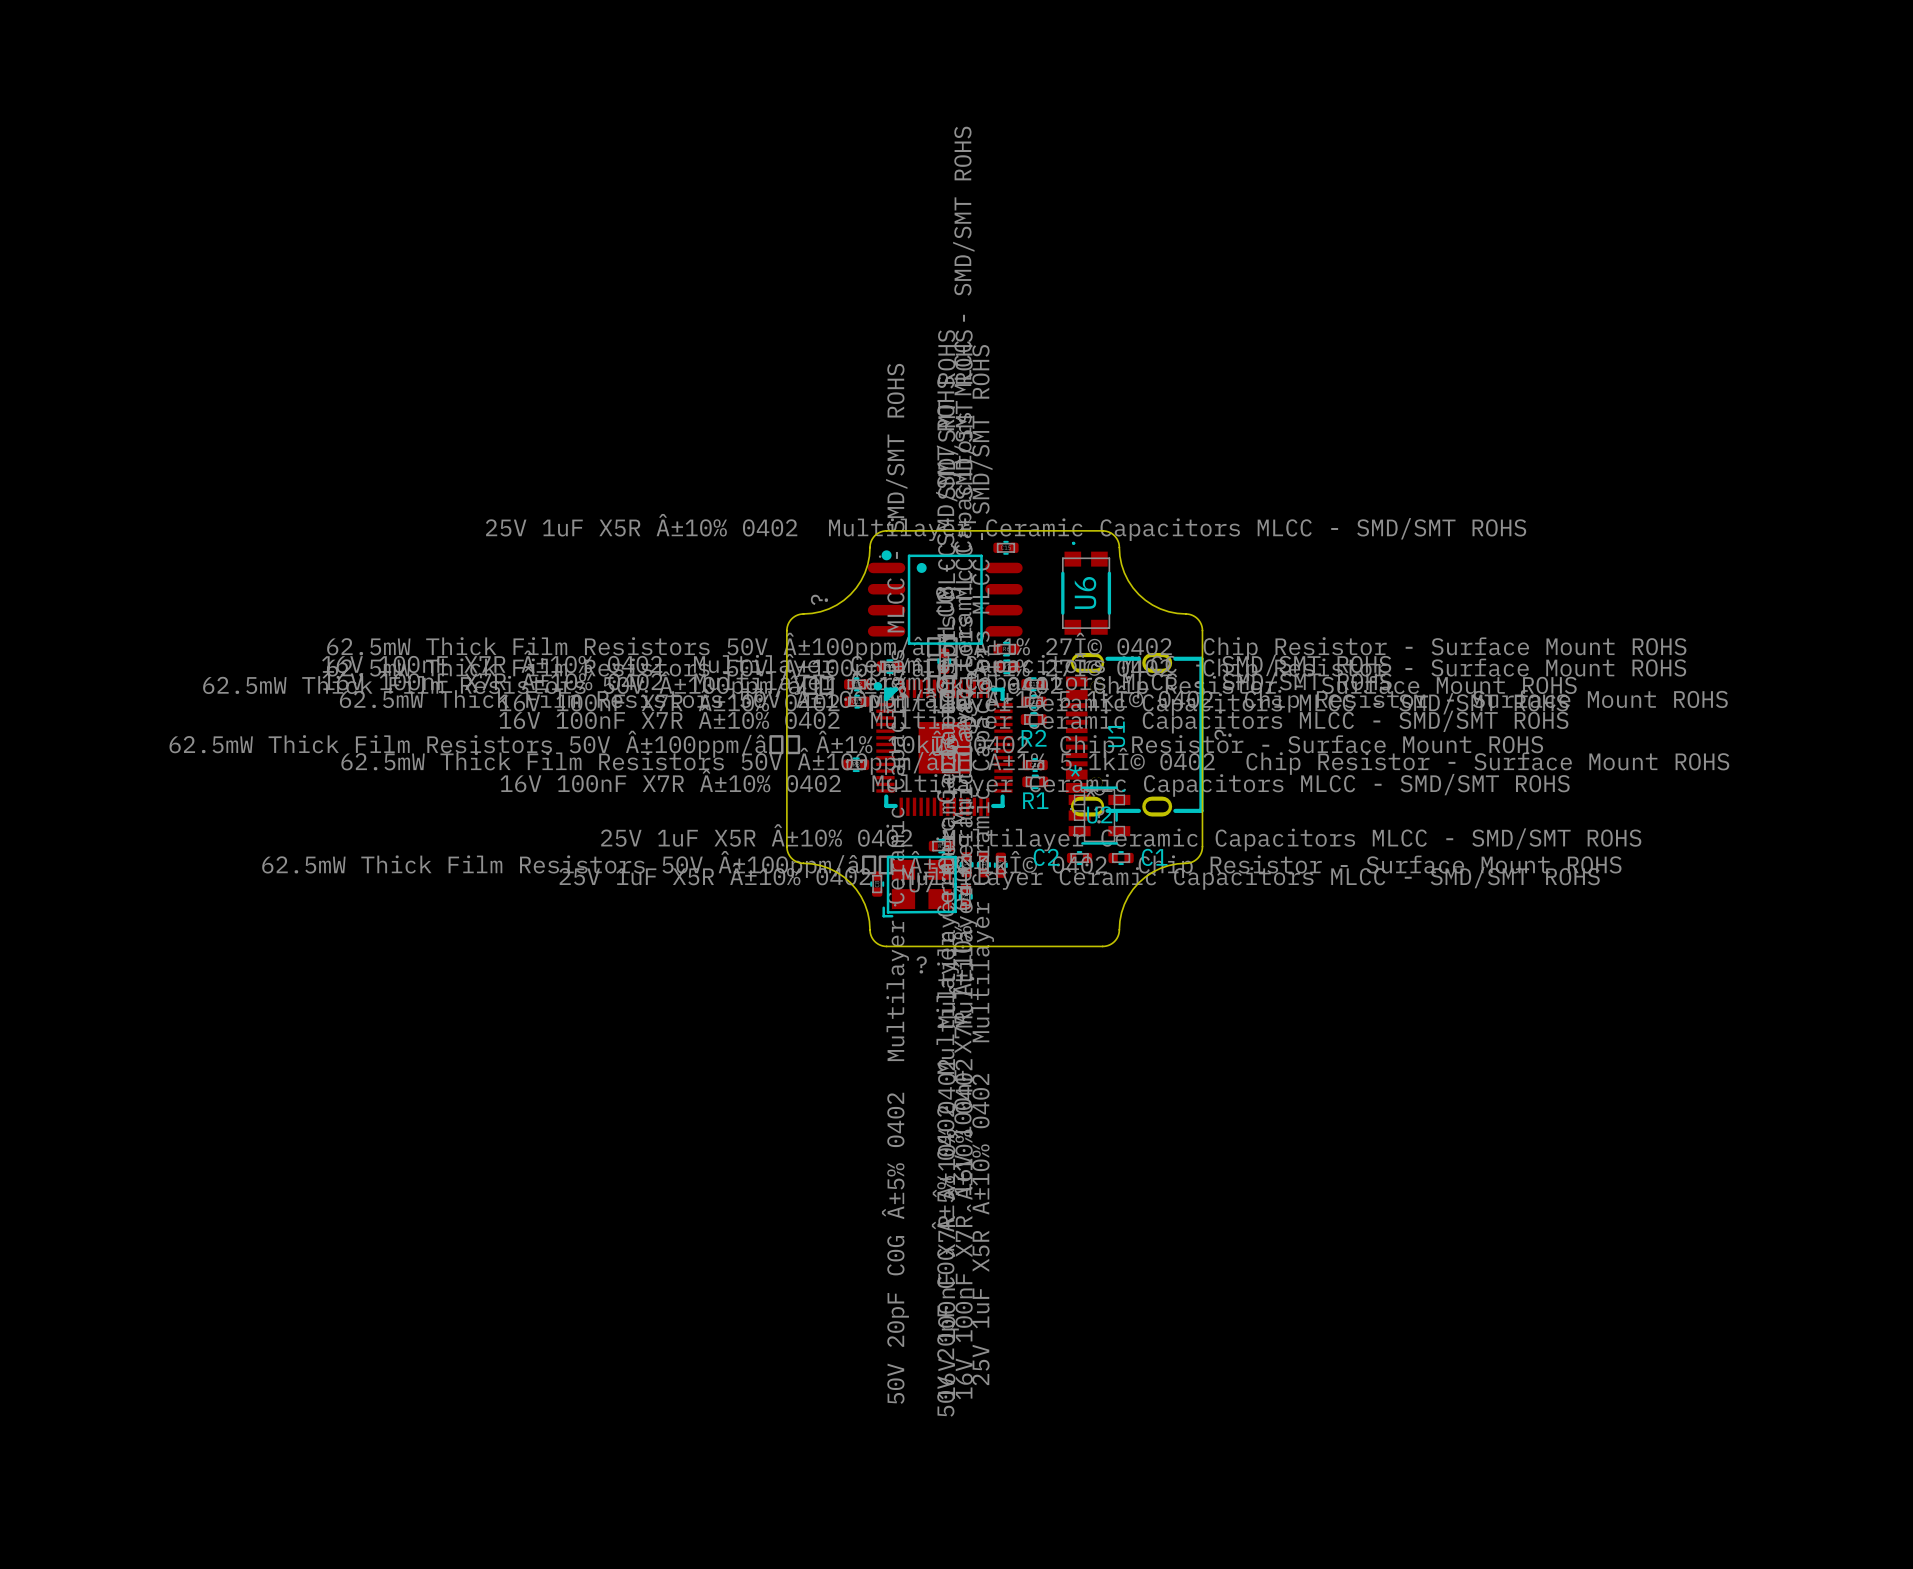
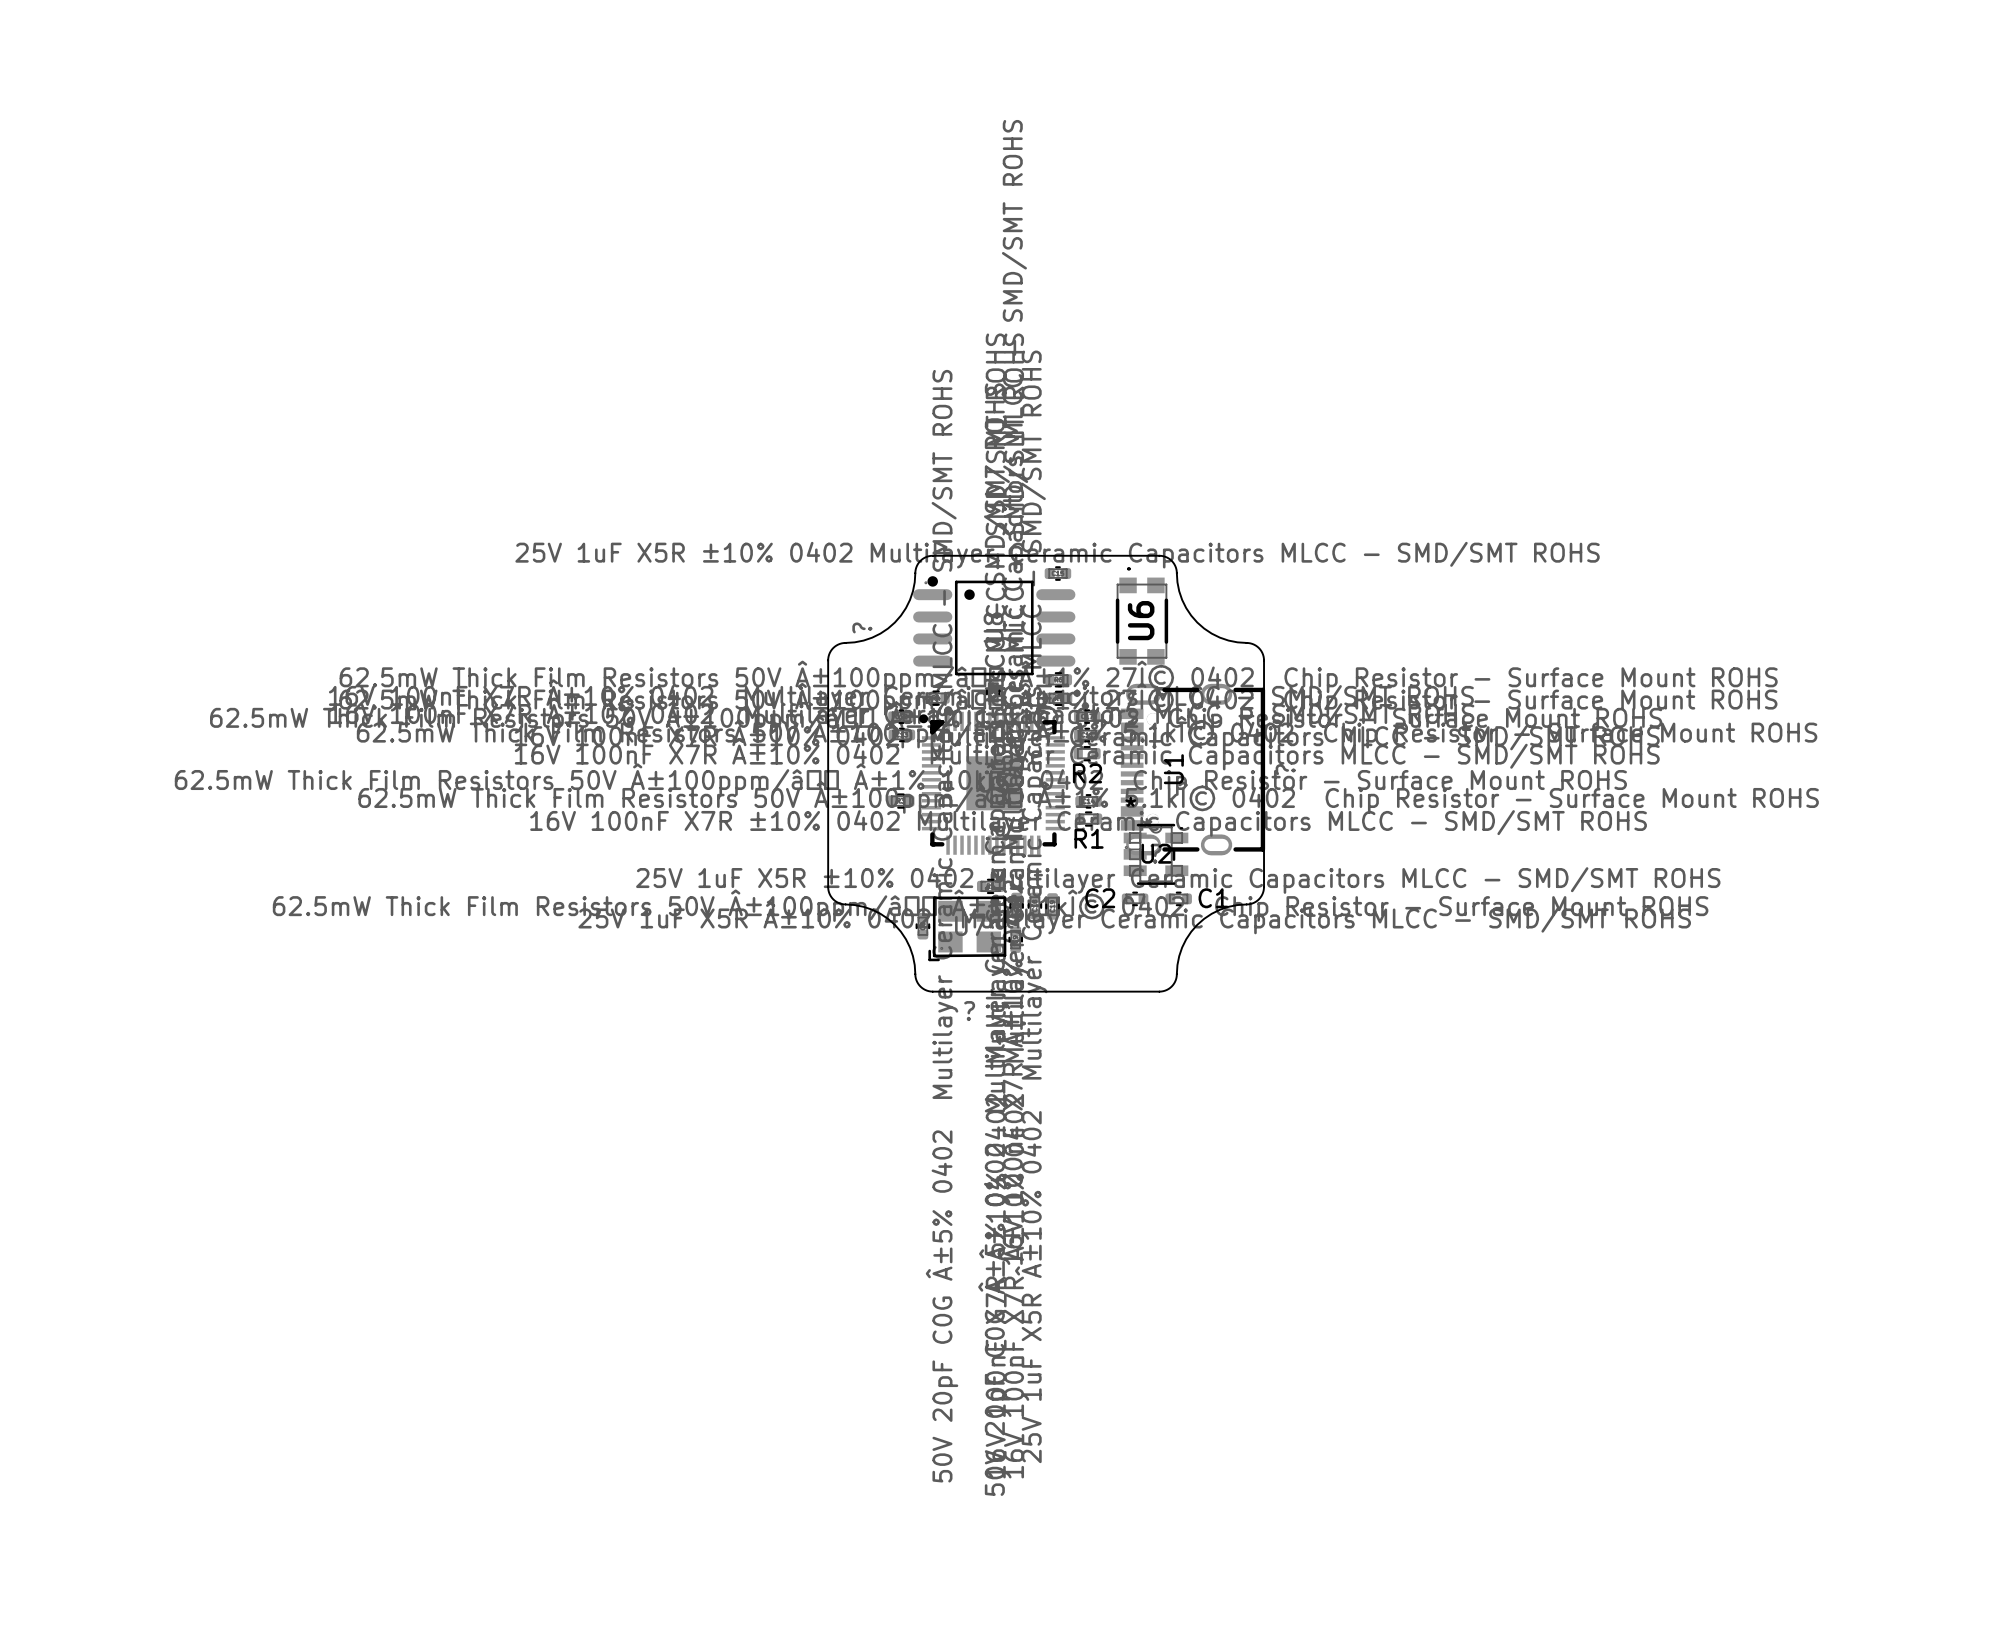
part value: 25V 1uF X5R Â±10% 0402 Multilayer Ceramic Capacitors MLCC - SMD/SMT ROHS (1006, 527) -> 25V 1uF X5R ±10% 0402 Multilayer Ceramic Capacitors MLCC - SMD/SMT ROHS (1057, 555)
part value: 16V 100nF X7R Â±10% 0402 Multilayer Ceramic Capacitors MLCC - SMD/SMT ROHS (1035, 783) -> 16V 100nF X7R ±10% 0402 Multilayer Ceramic Capacitors MLCC - SMD/SMT ROHS (1088, 823)
C1 value: 25V 1uF X5R Â±10% 0402 Multilayer Ceramic Capacitors MLCC - SMD/SMT ROHS (1121, 837) -> 25V 1uF X5R ±10% 0402 Multilayer Ceramic Capacitors MLCC - SMD/SMT ROHS (1178, 880)

